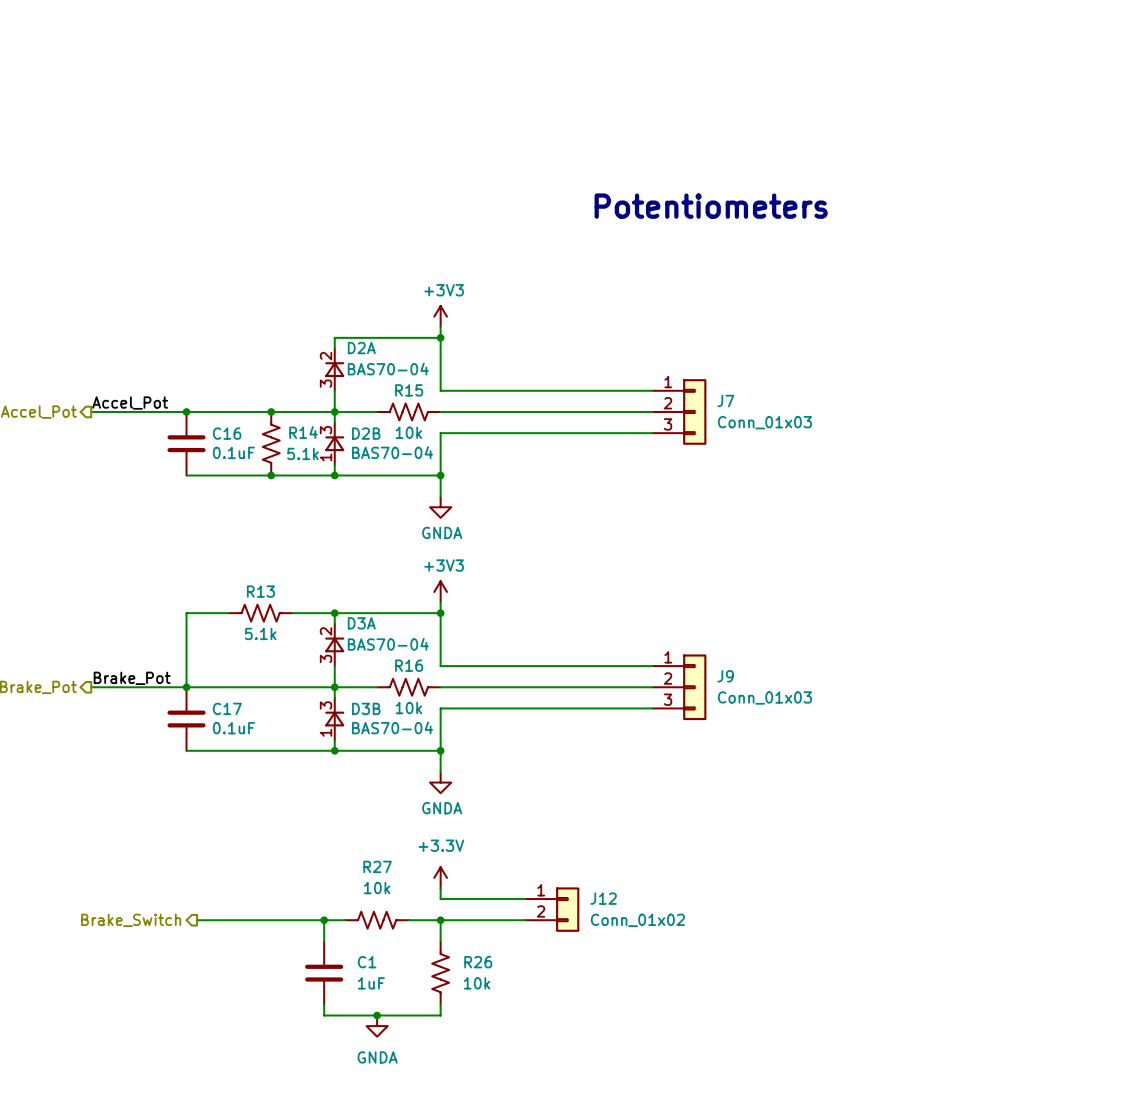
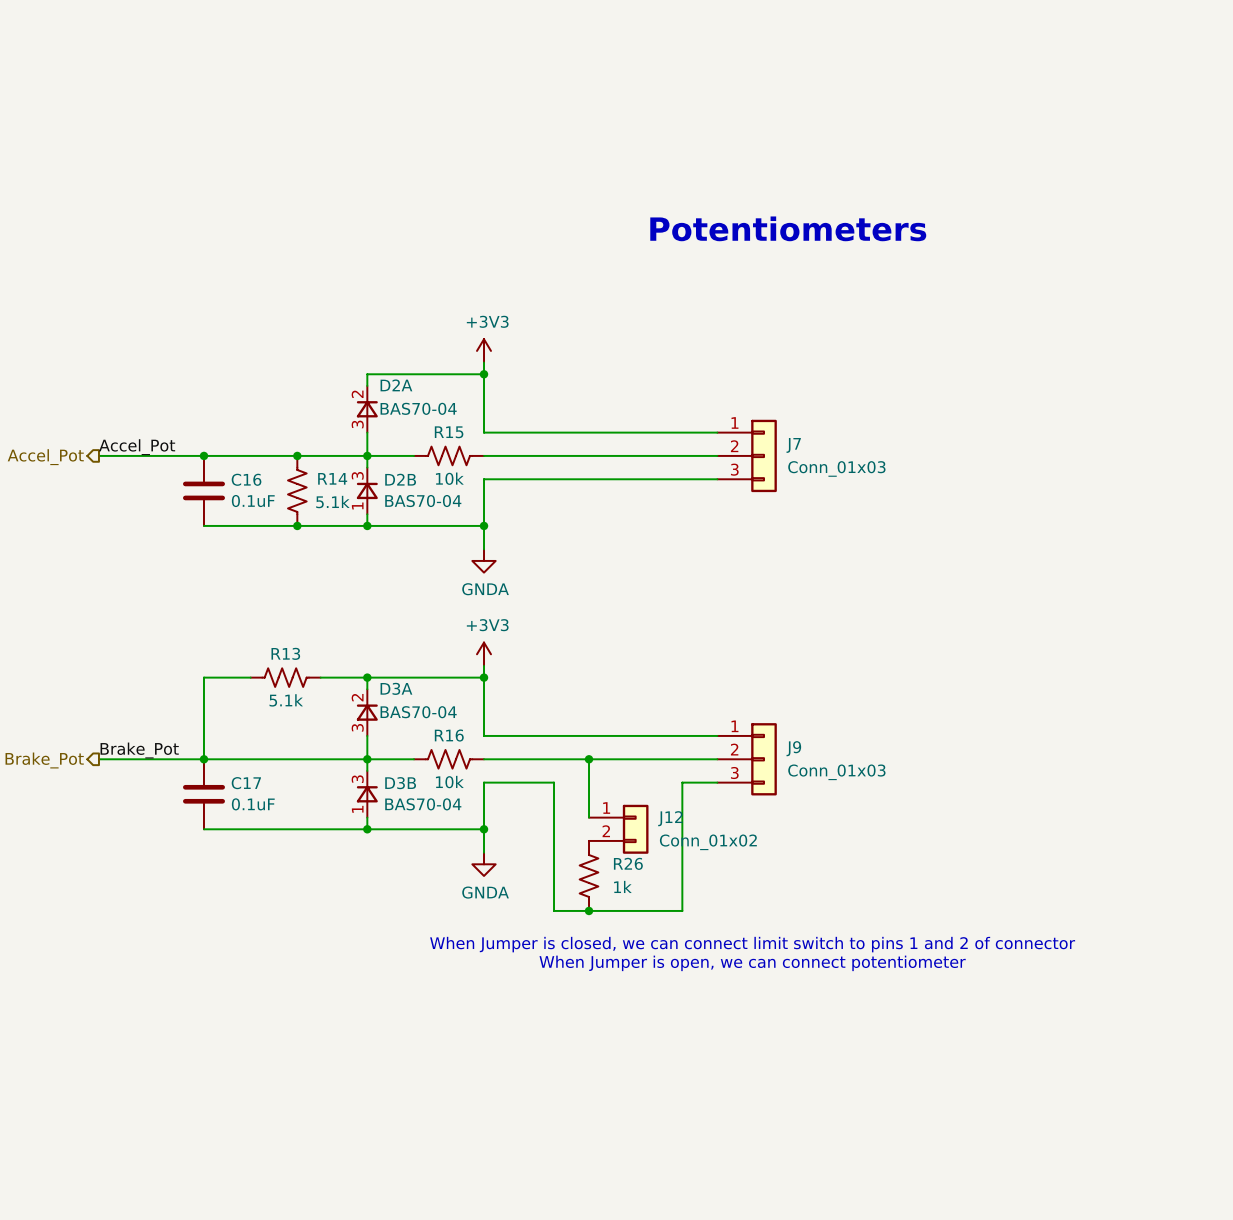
wire: none -> (589, 759) (589, 817)
junction: none -> (589, 759)
wire: (504, 708) (620, 708) -> (554, 782) (554, 910) (682, 910) (682, 782)
junction: none -> (589, 910)
text: none -> When Jumper is closed, we can connect limit switch to pins 1 and 2 of connector (752, 944)
text: none -> When Jumper is open, we can connect potentiometer (752, 963)
power symbol: +3.3V (440, 877) -> none
wire: (440, 888) (440, 899) (525, 899) -> none
J12 position: (552, 909) -> (618, 829)
hierarchical label: Brake_Switch (131, 920) -> none
wire: (197, 920) (345, 920) -> none
wire: (324, 920) (324, 941) -> none
junction: (324, 920) -> none
R27: 10k (377, 920) -> none
wire: (408, 920) (525, 920) -> none
wire: (440, 920) (440, 941) -> none
junction: (440, 920) -> none
C1: 1uF (324, 973) -> none
R26 position: (440, 973) -> (589, 875)
R26 value: 10k (477, 983) -> 1k (622, 886)
wire: (324, 1004) (324, 1015) (440, 1015) (440, 1004) -> none
junction: (377, 1015) -> none
power symbol: GNDA (377, 1026) -> none

